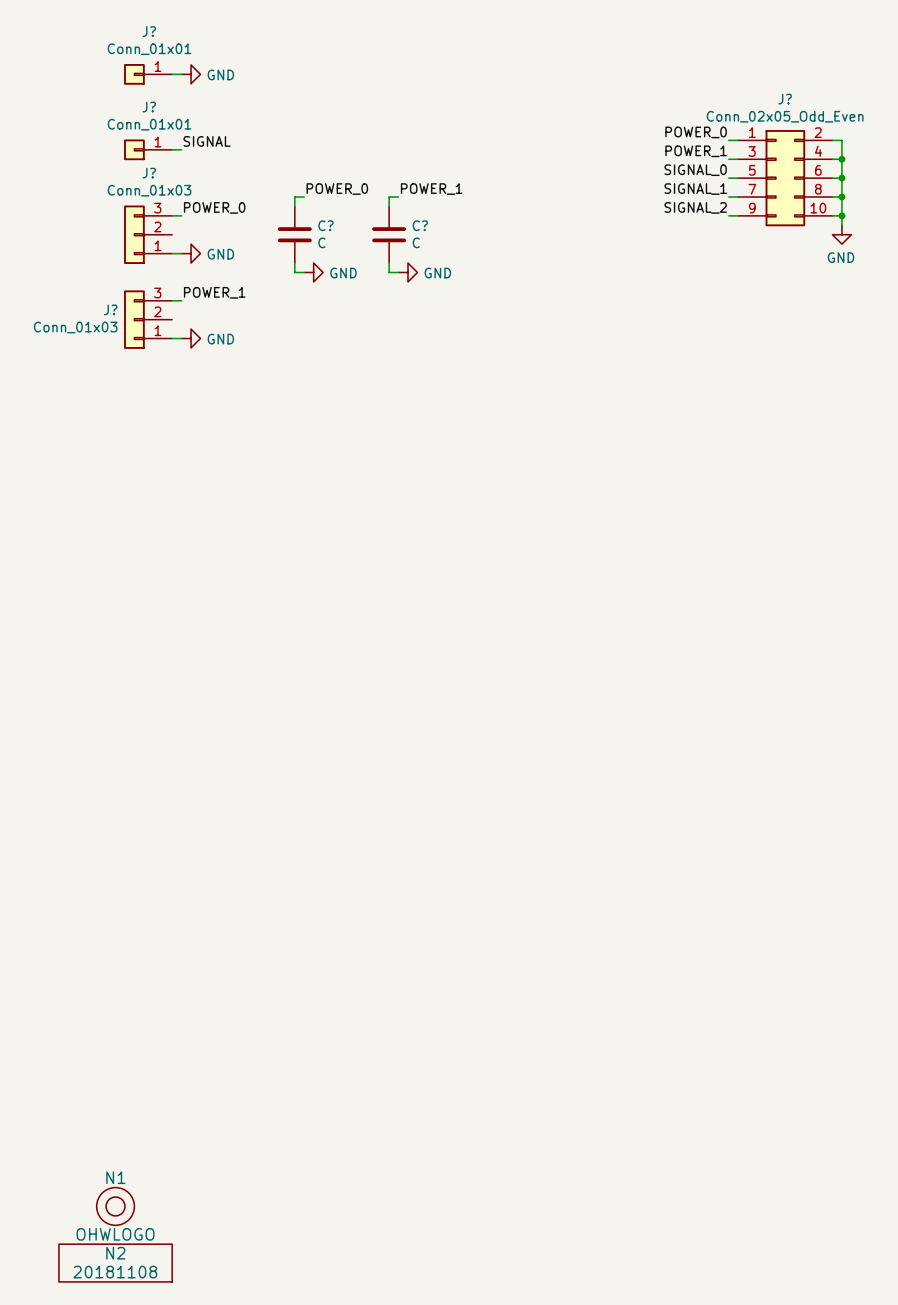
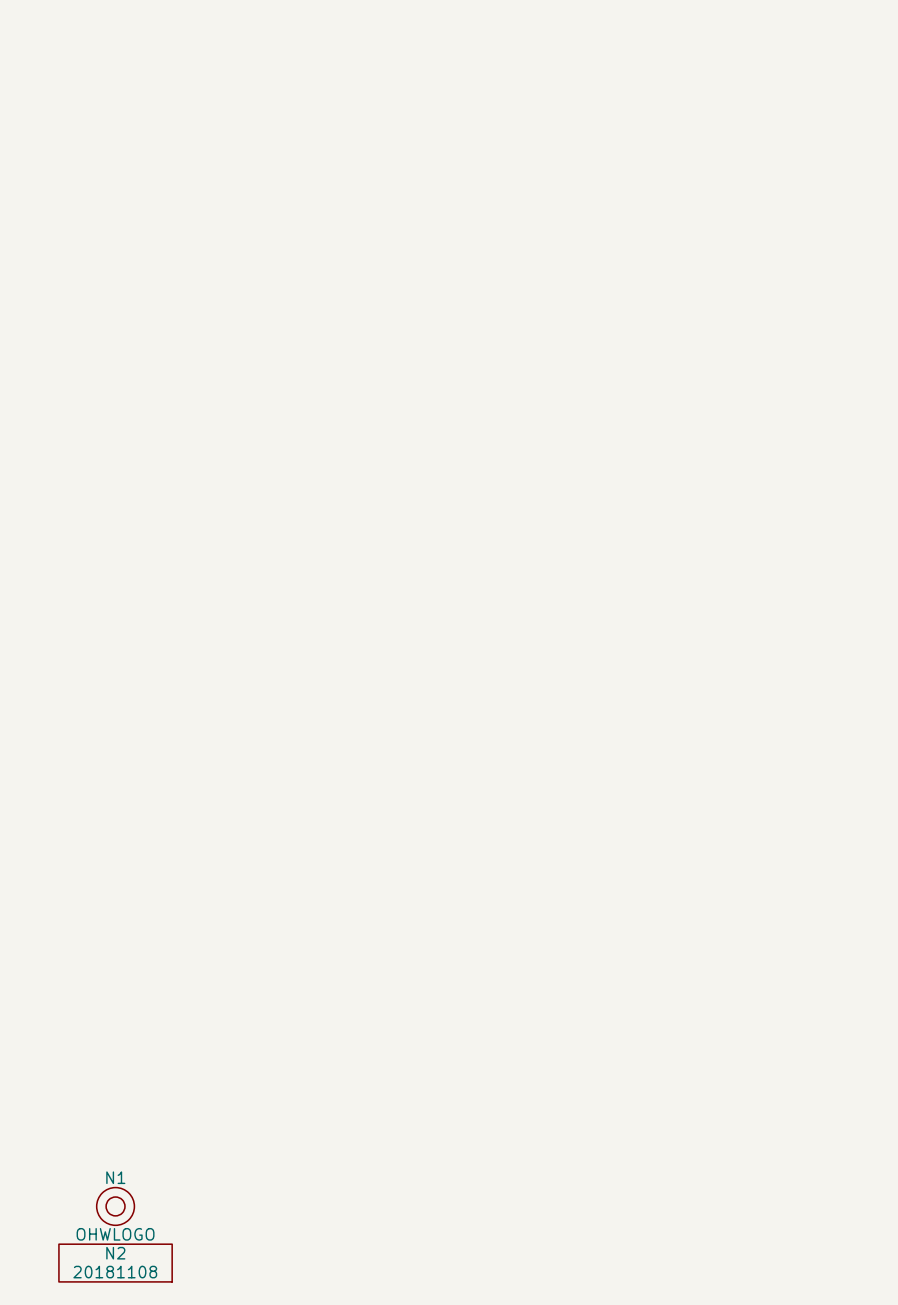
J?: Conn_01x01 (148, 74) -> none
wire: (172, 74) (181, 74) -> none
power symbol: GND (191, 74) -> none
label: POWER_0 (696, 132) -> none
wire: (728, 140) (738, 140) -> none
wire: (832, 140) (841, 140) (841, 225) -> none
label: SIGNAL (207, 141) -> none
J?: Conn_01x01 (148, 149) -> none
wire: (172, 149) (181, 149) -> none
label: POWER_1 (696, 151) -> none
wire: (728, 159) (738, 159) -> none
wire: (832, 159) (841, 159) -> none
junction: (841, 159) -> none
label: SIGNAL_0 (695, 170) -> none
wire: (728, 178) (738, 178) -> none
J?: Conn_02x05_Odd_Even (785, 178) -> none
wire: (832, 178) (841, 178) -> none
junction: (841, 178) -> none
label: POWER_0 (337, 189) -> none
label: POWER_1 (431, 189) -> none
label: SIGNAL_1 (695, 189) -> none
wire: (304, 197) (294, 197) (294, 206) -> none
wire: (398, 197) (389, 197) (389, 206) -> none
wire: (728, 197) (738, 197) -> none
wire: (832, 197) (841, 197) -> none
junction: (841, 197) -> none
label: POWER_0 (214, 207) -> none
label: SIGNAL_2 (695, 207) -> none
wire: (172, 215) (181, 215) -> none
wire: (728, 215) (738, 215) -> none
wire: (832, 215) (841, 215) -> none
junction: (841, 215) -> none
J?: Conn_01x03 (148, 234) -> none
C?: C (294, 234) -> none
C?: C (389, 234) -> none
power symbol: GND (841, 234) -> none
wire: (172, 253) (181, 253) -> none
power symbol: GND (191, 253) -> none
wire: (294, 263) (294, 272) (304, 272) -> none
wire: (389, 263) (389, 272) (398, 272) -> none
power symbol: GND (313, 272) -> none
power symbol: GND (408, 272) -> none
label: POWER_1 (214, 292) -> none
wire: (172, 300) (181, 300) -> none
J?: Conn_01x03 (148, 319) -> none
wire: (172, 338) (181, 338) -> none
power symbol: GND (191, 338) -> none

